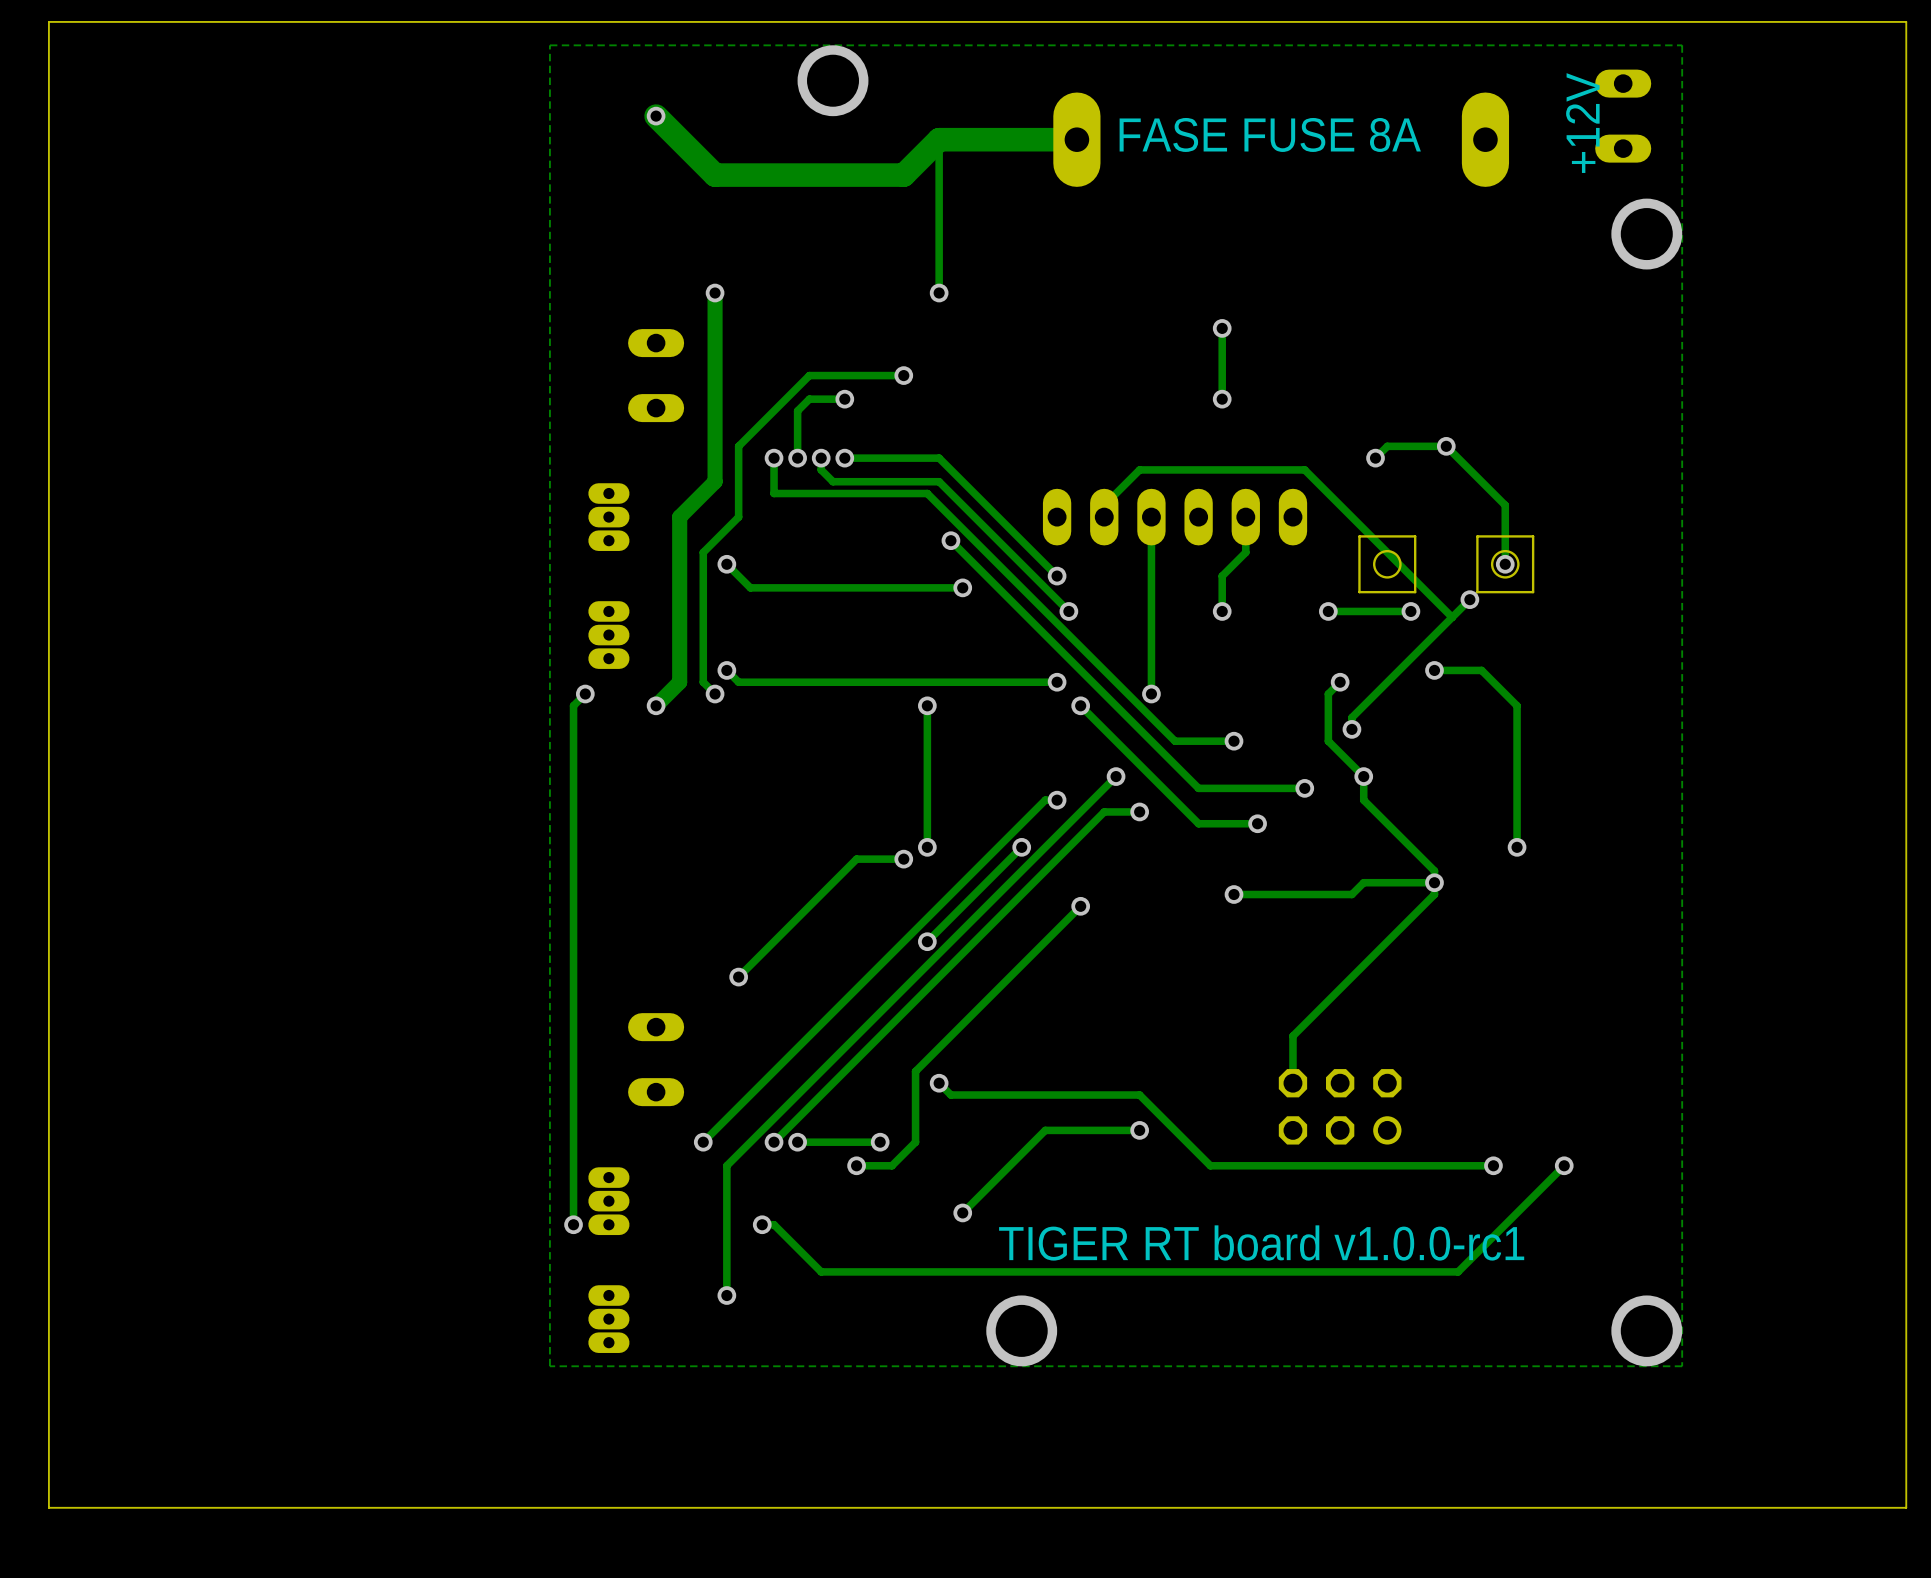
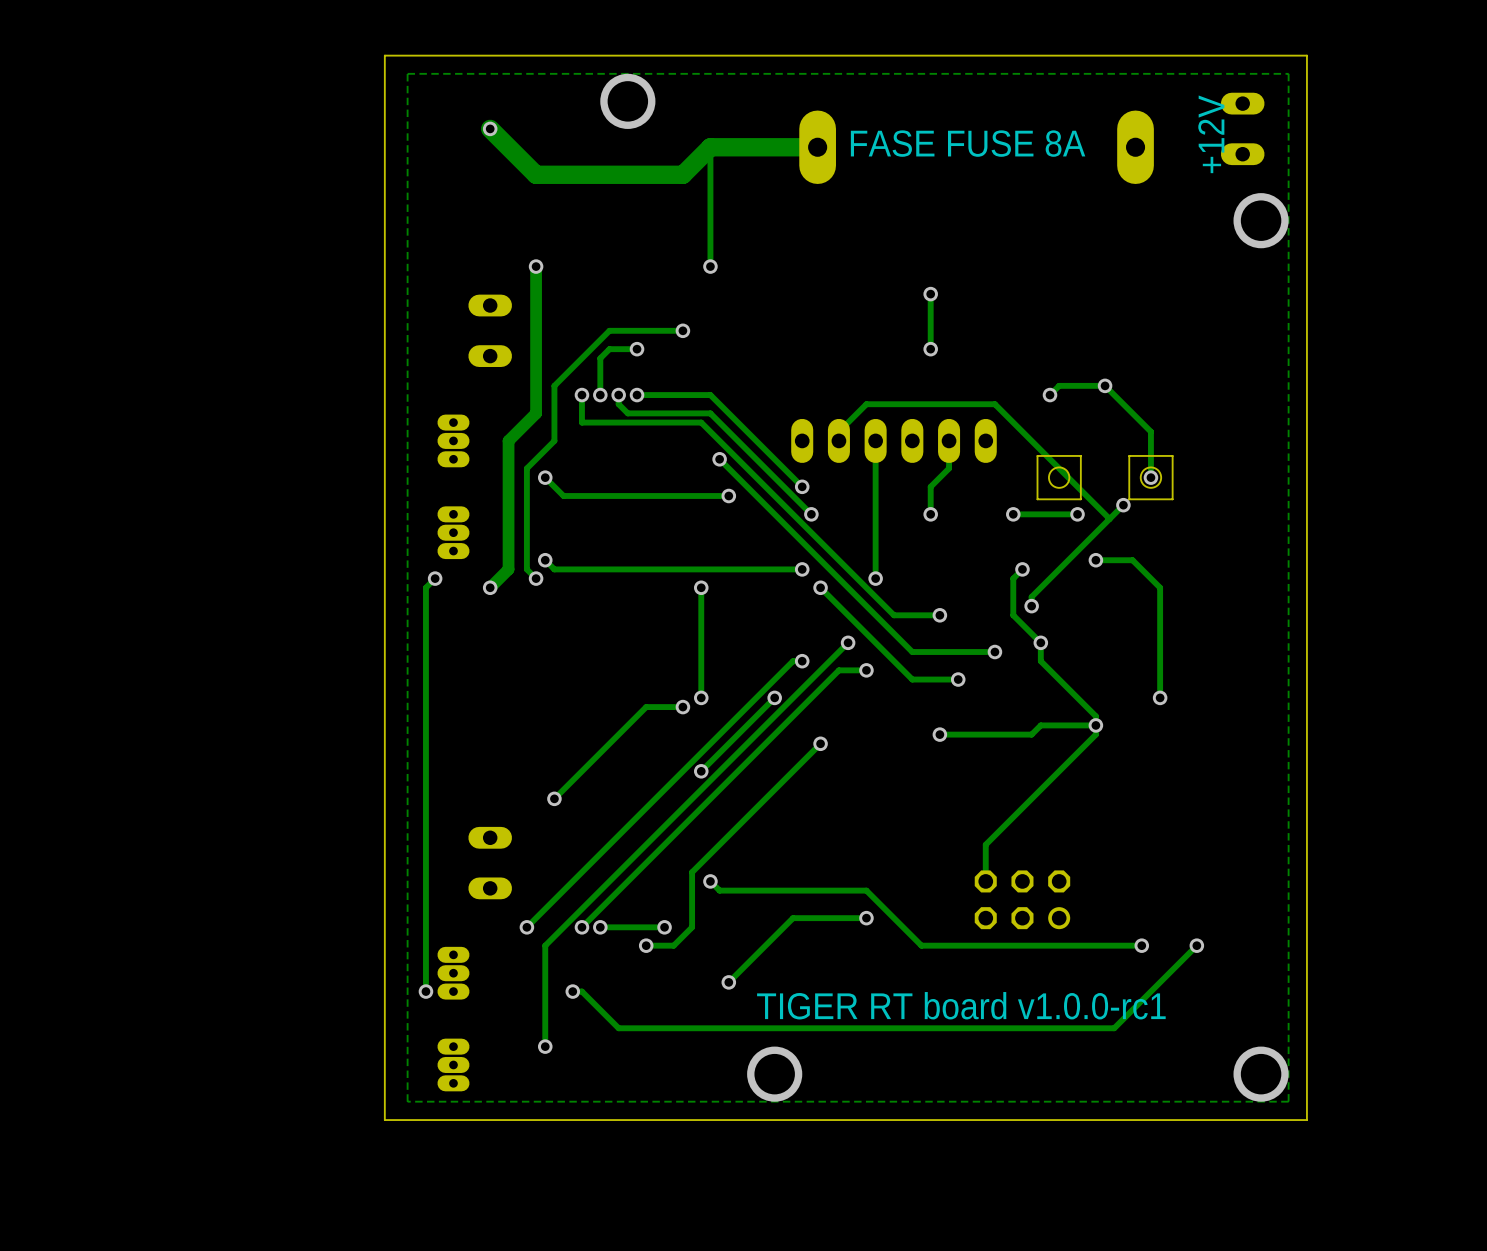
board edge: (1705, 21) (1906, 21) (1906, 1507) (48, 1507) (48, 21) (520, 21) -> (1306, 55) (1306, 1120) (384, 1120) (384, 55)

